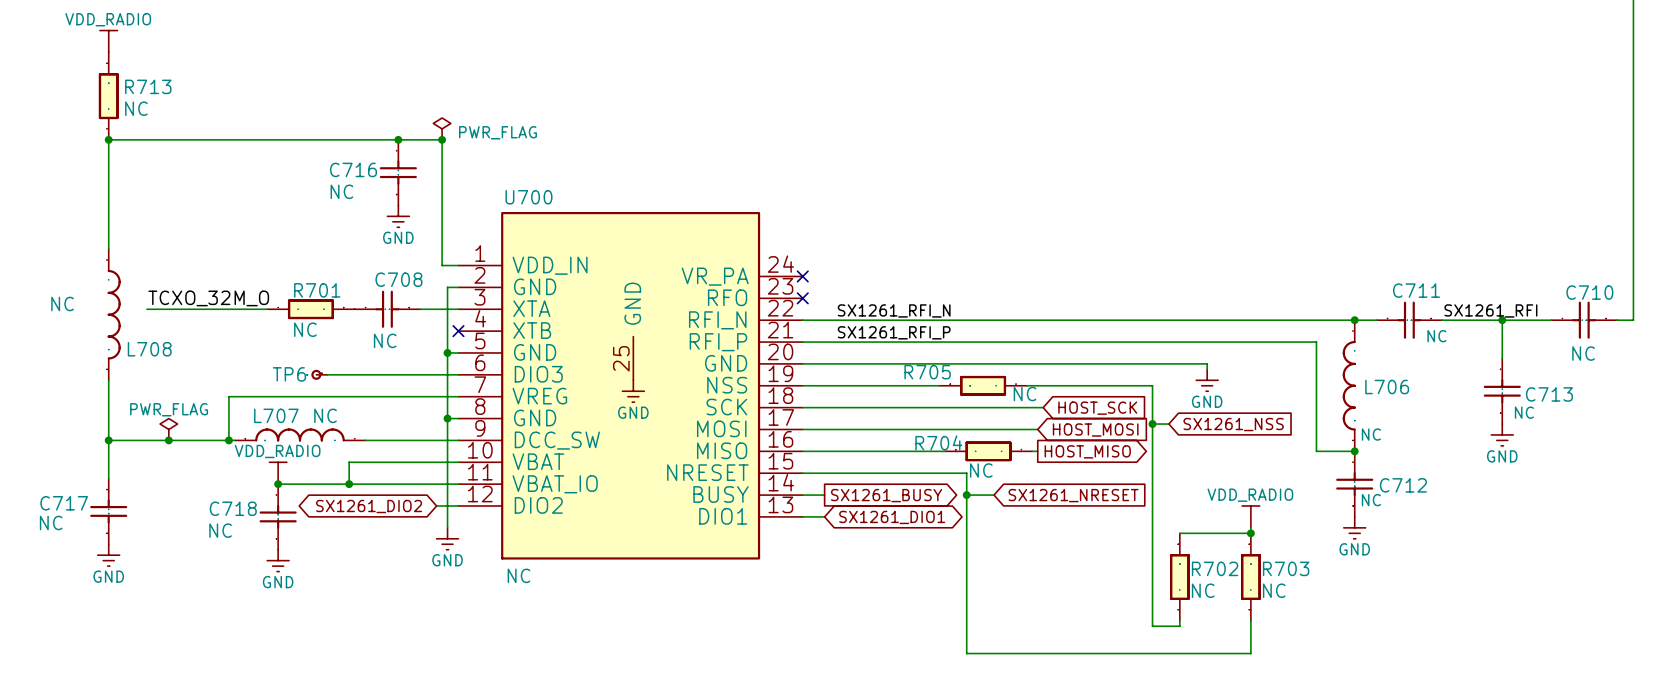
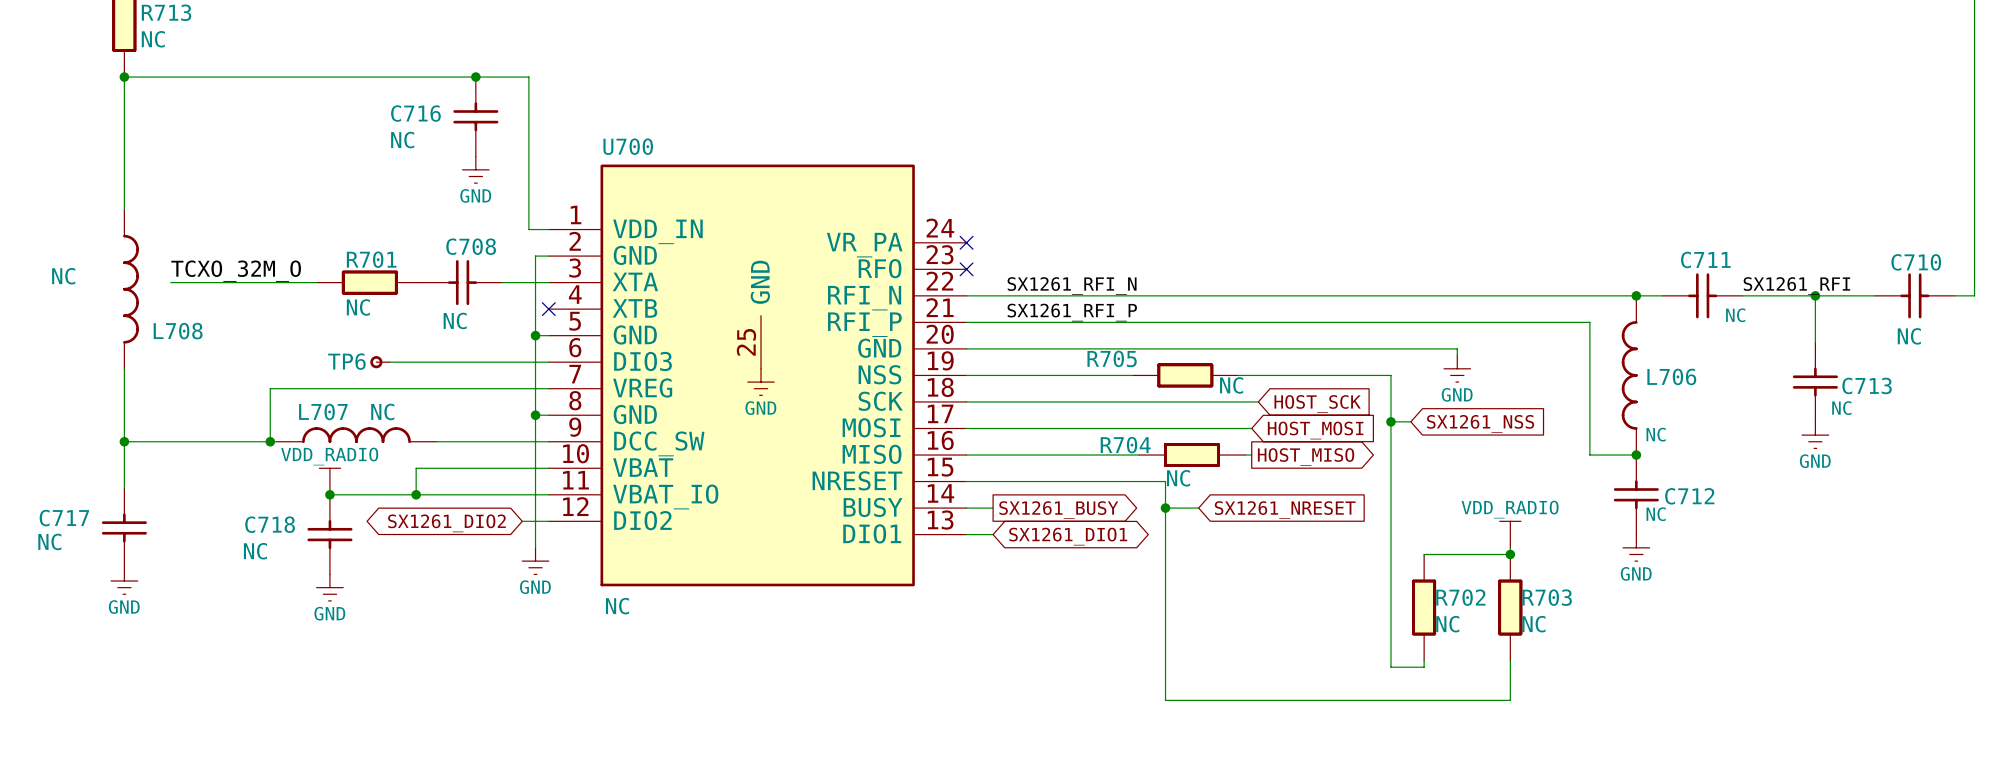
power symbol: PWR_FLAG (442, 128) -> none
junction: (442, 139) -> none
power symbol: PWR_FLAG (168, 429) -> none
junction: (168, 440) -> none

